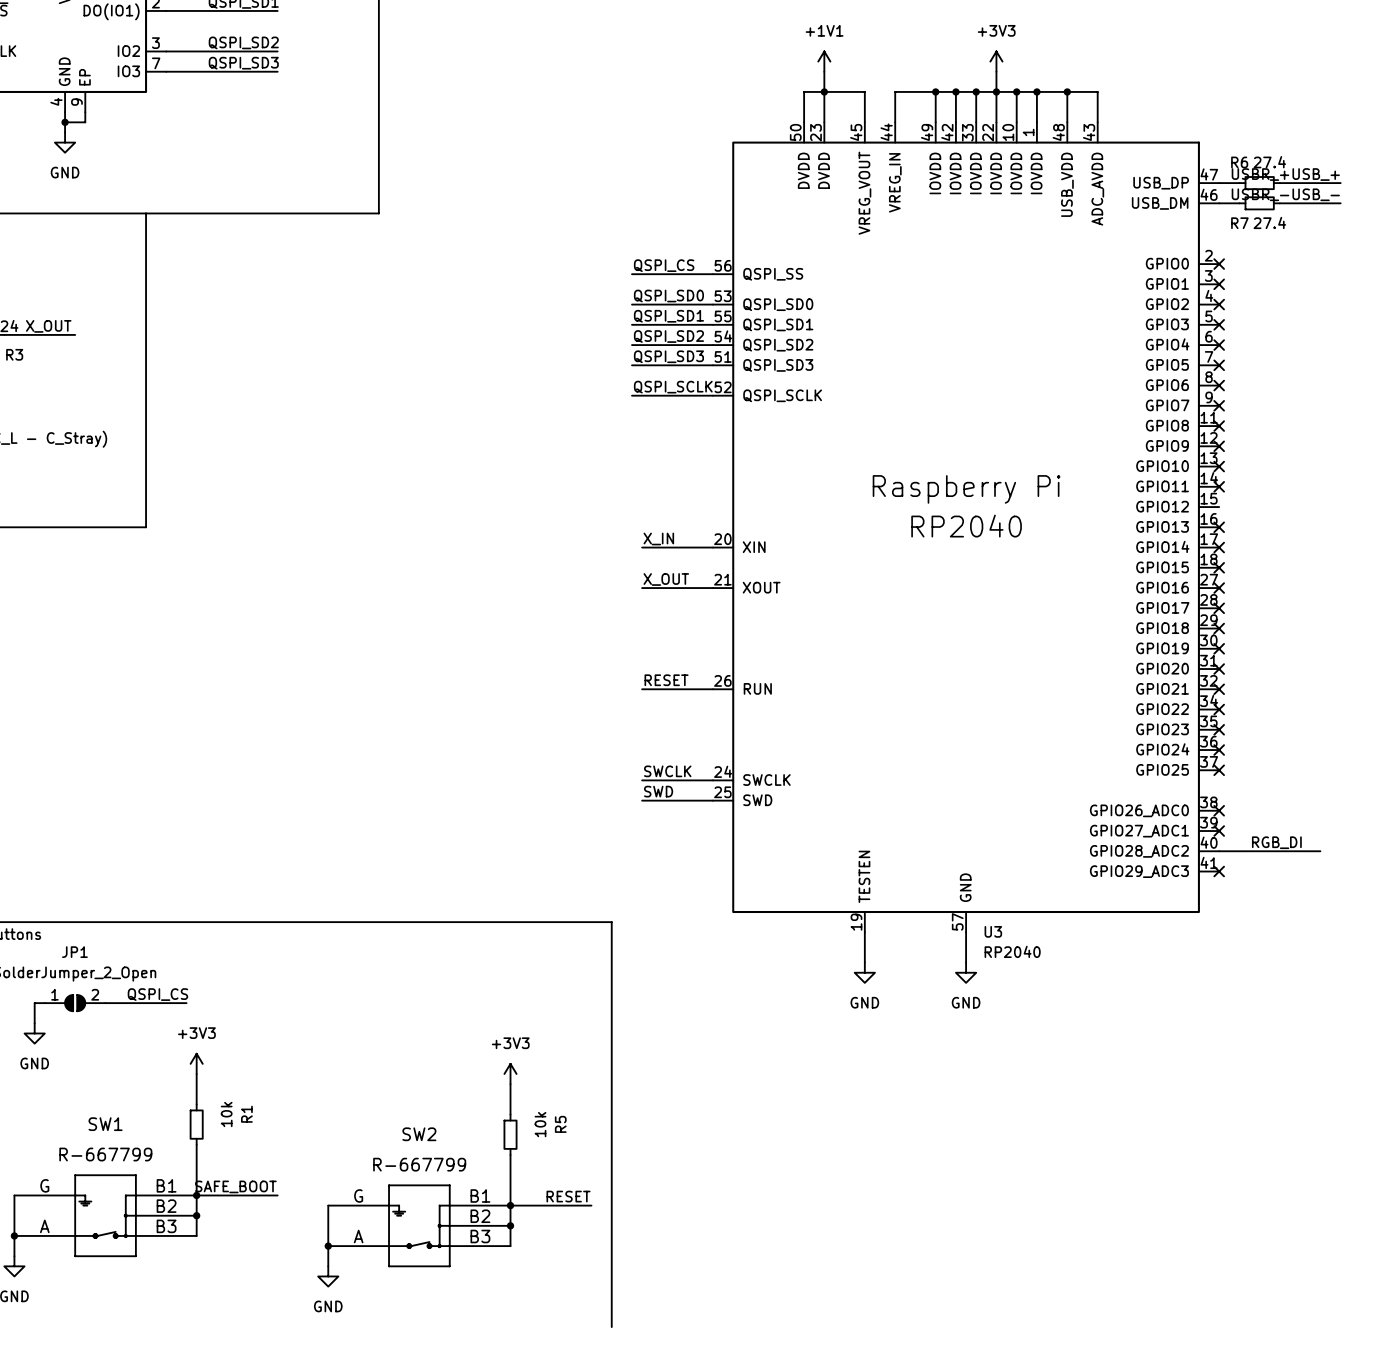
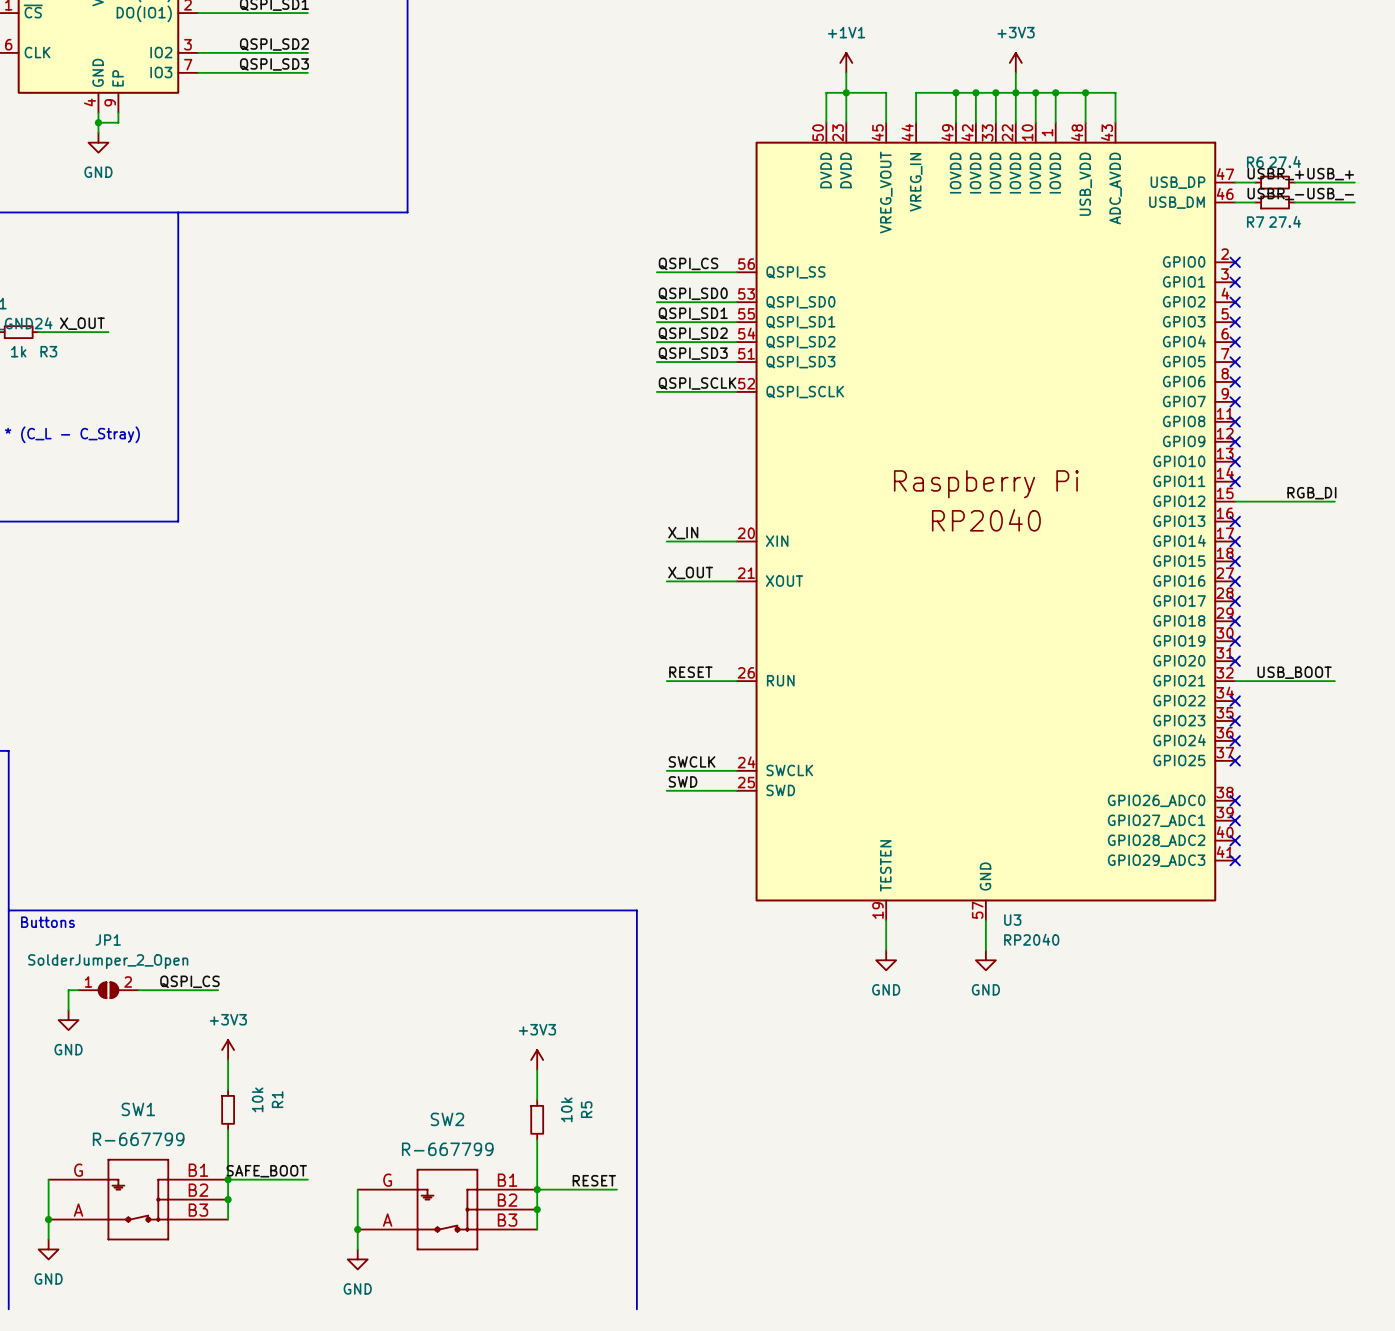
label: none -> RGB_DI (1311, 493)
wire: none -> (1235, 501) (1334, 501)
label: none -> USB_BOOT (1294, 672)
no-connect mark: (1219, 689) -> none
label: RGB_DI (1276, 842) -> none
wire: (1219, 851) (1320, 851) -> (1235, 681) (1334, 681)
no-connect mark: none -> (1235, 840)

